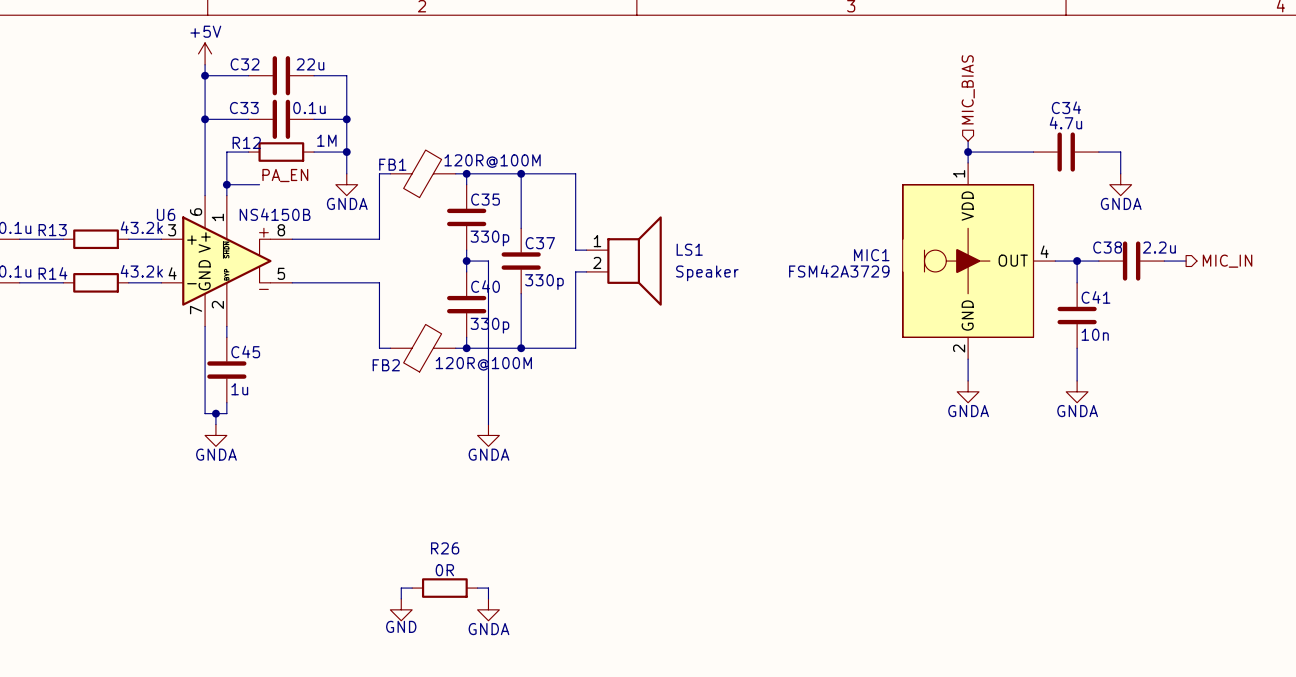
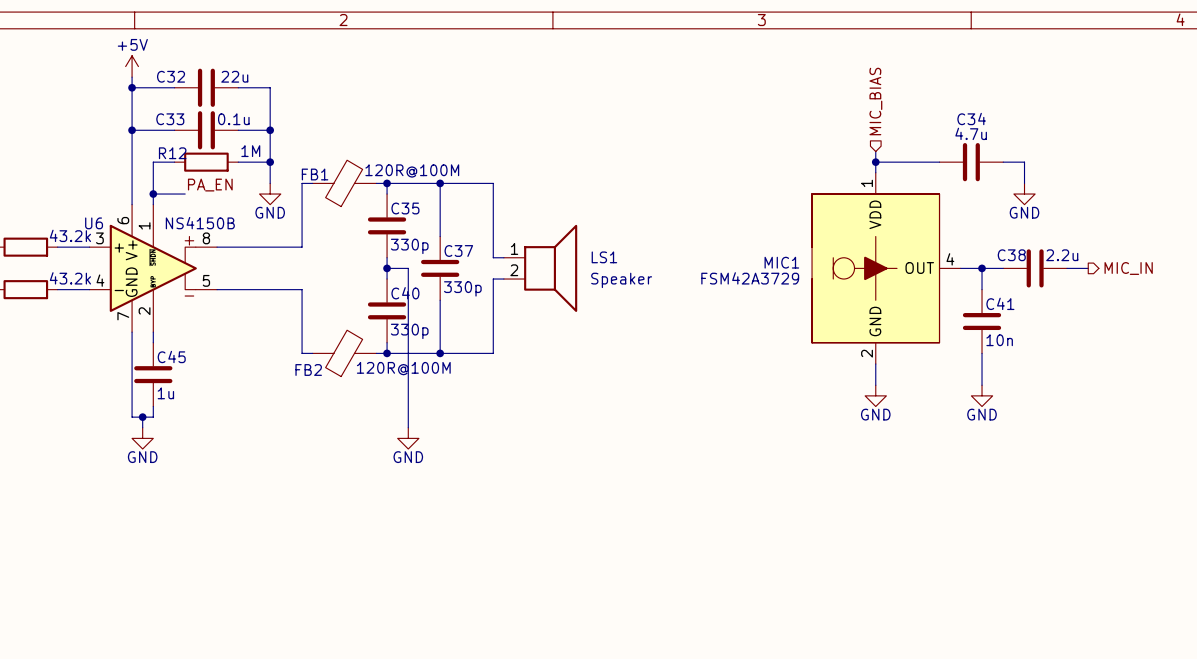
power symbol: GNDA (346, 184) -> GND (270, 194)
power symbol: GNDA (1120, 184) -> GND (1024, 194)
power symbol: GNDA (968, 391) -> GND (875, 395)
power symbol: GNDA (1077, 391) -> GND (982, 395)
power symbol: GNDA (215, 435) -> GND (142, 438)
power symbol: GNDA (488, 435) -> GND (408, 438)
wire: (412, 588) (401, 588) (401, 598) -> none
R26: 0R (444, 588) -> none
wire: (477, 588) (488, 588) (488, 598) -> none
power symbol: GND (401, 609) -> none
power symbol: GNDA (488, 609) -> none

